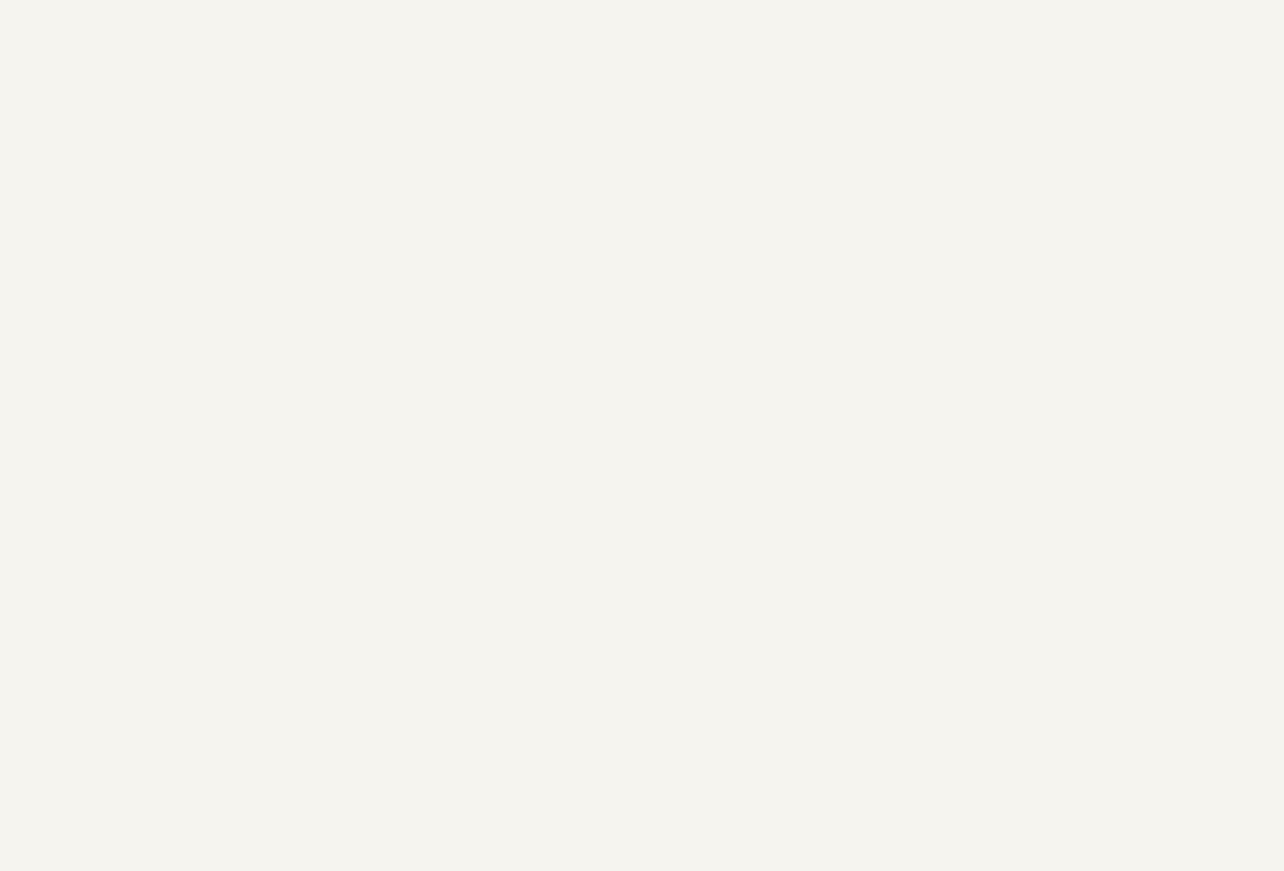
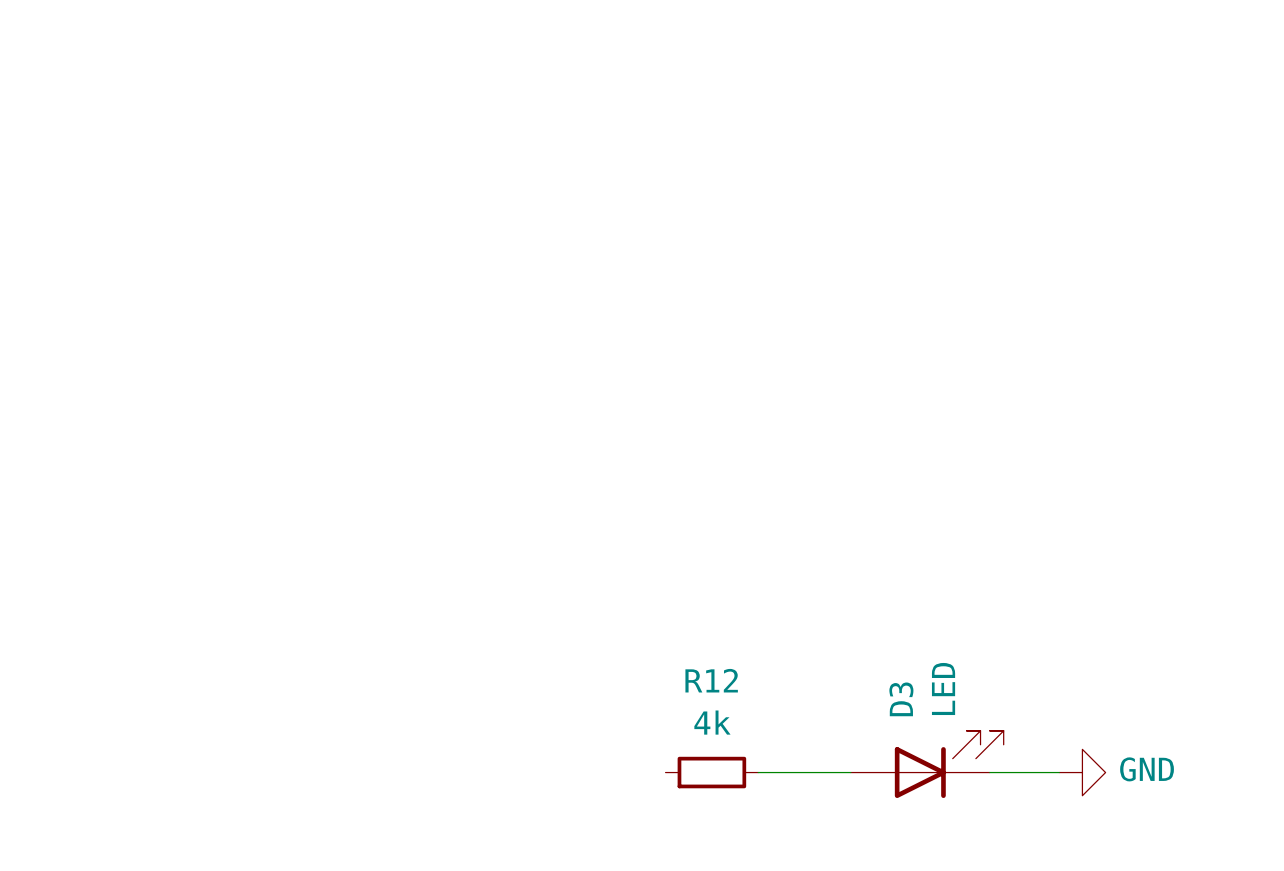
D3: none -> LED (927, 764)
R12: none -> 4k (711, 772)
wire: none -> (758, 772) (850, 772)
wire: none -> (989, 772) (1059, 772)
power symbol: none -> GND (1082, 772)

